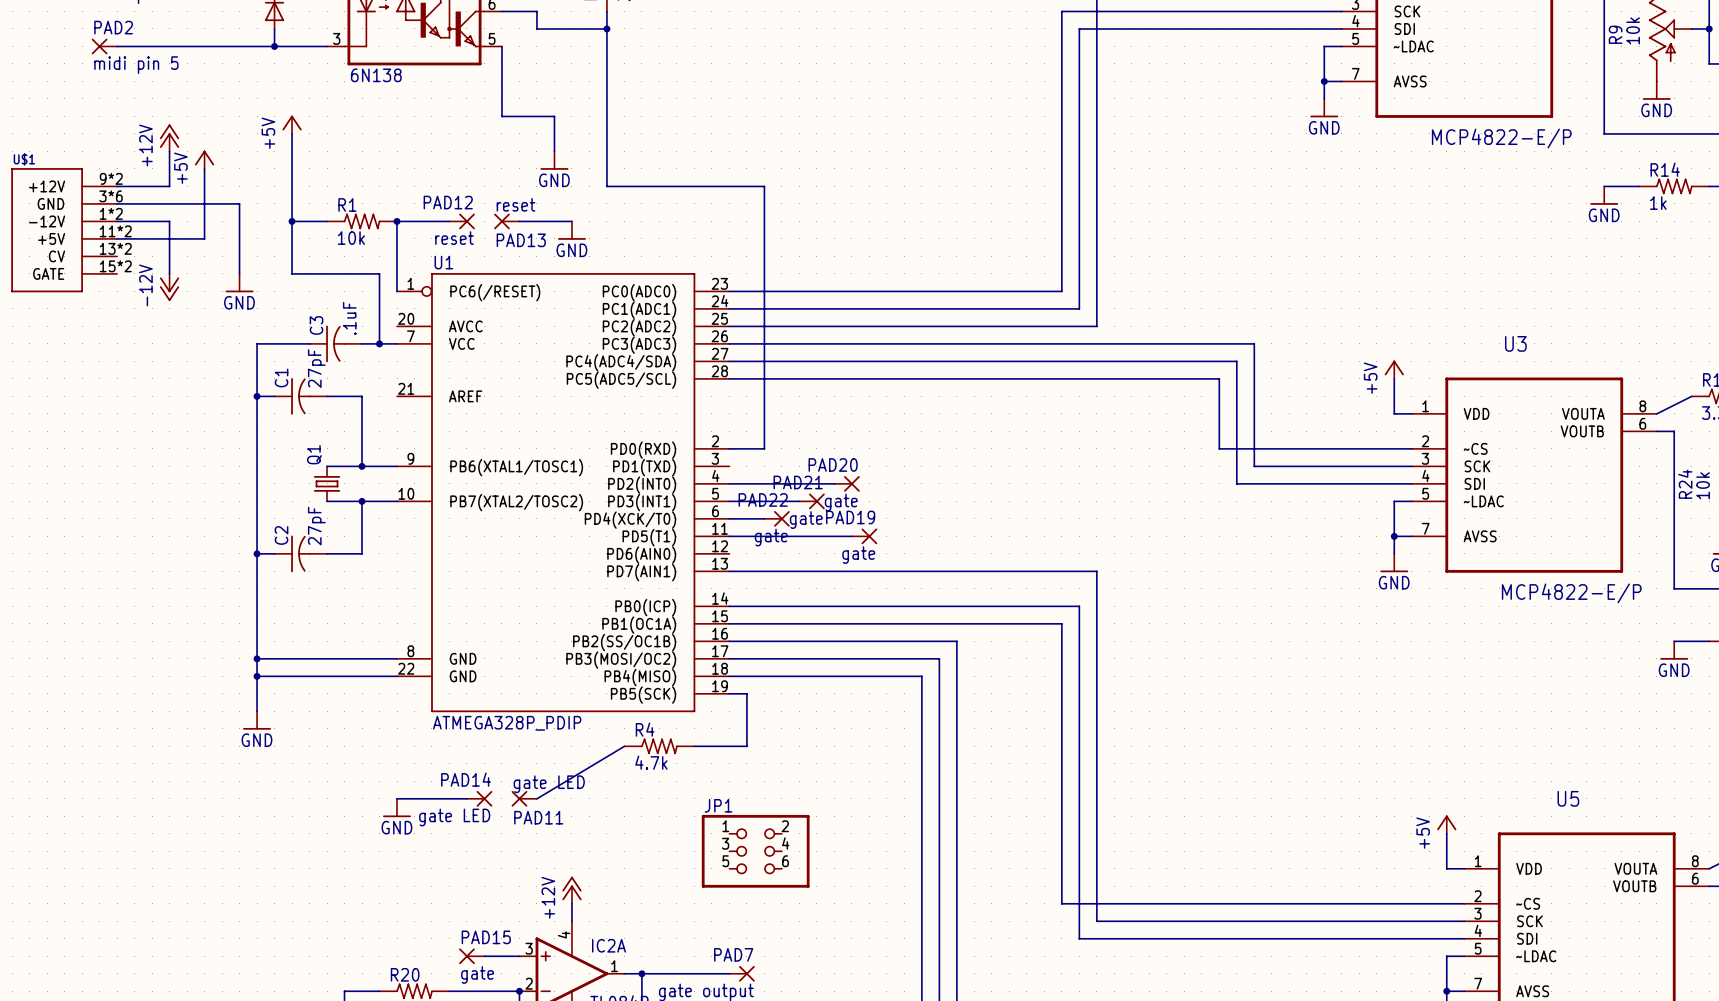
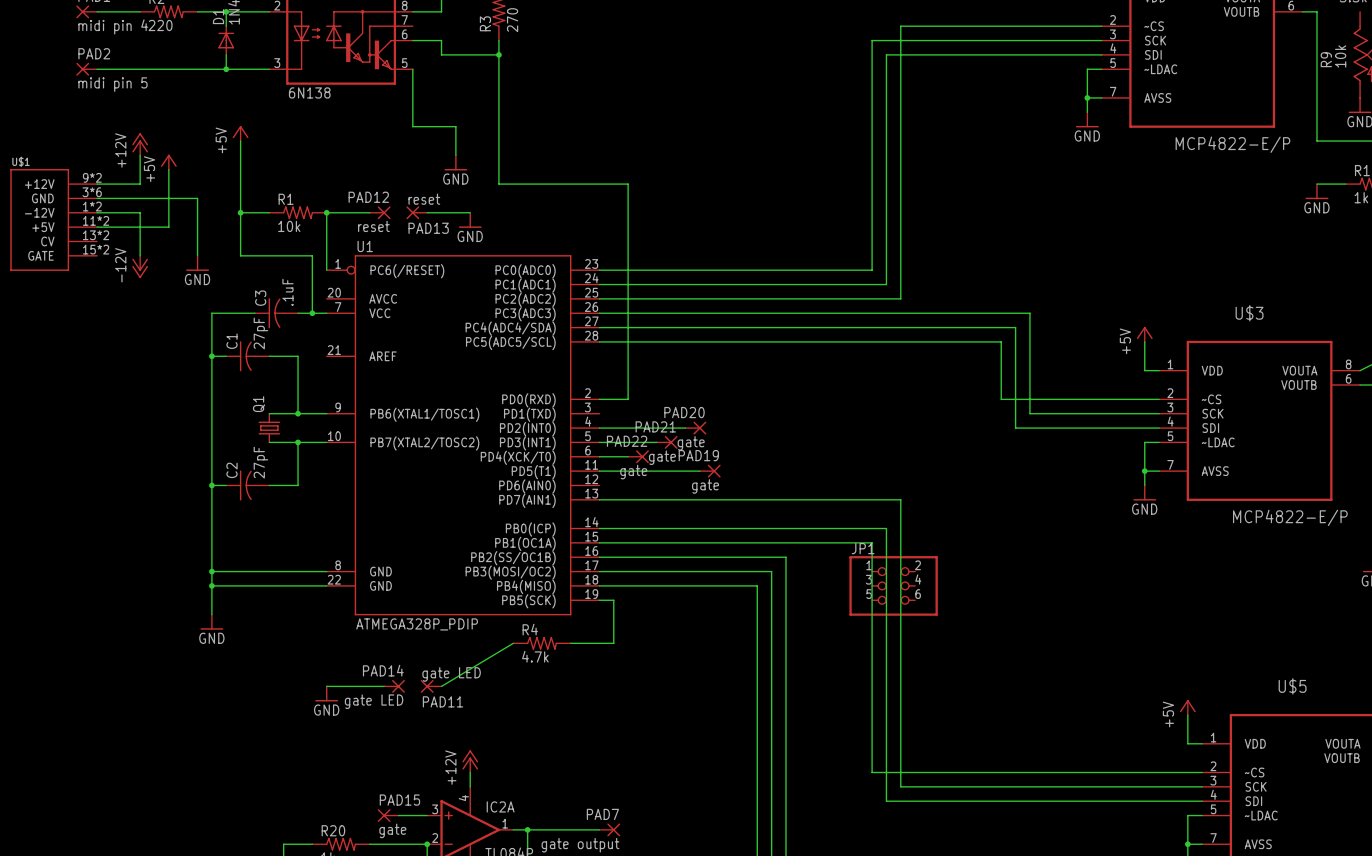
U3 name: U3 (1515, 343) -> U$3 (1249, 313)
U5 name: U5 (1568, 798) -> U$5 (1292, 686)
JP1 position: (755, 851) -> (893, 585)

